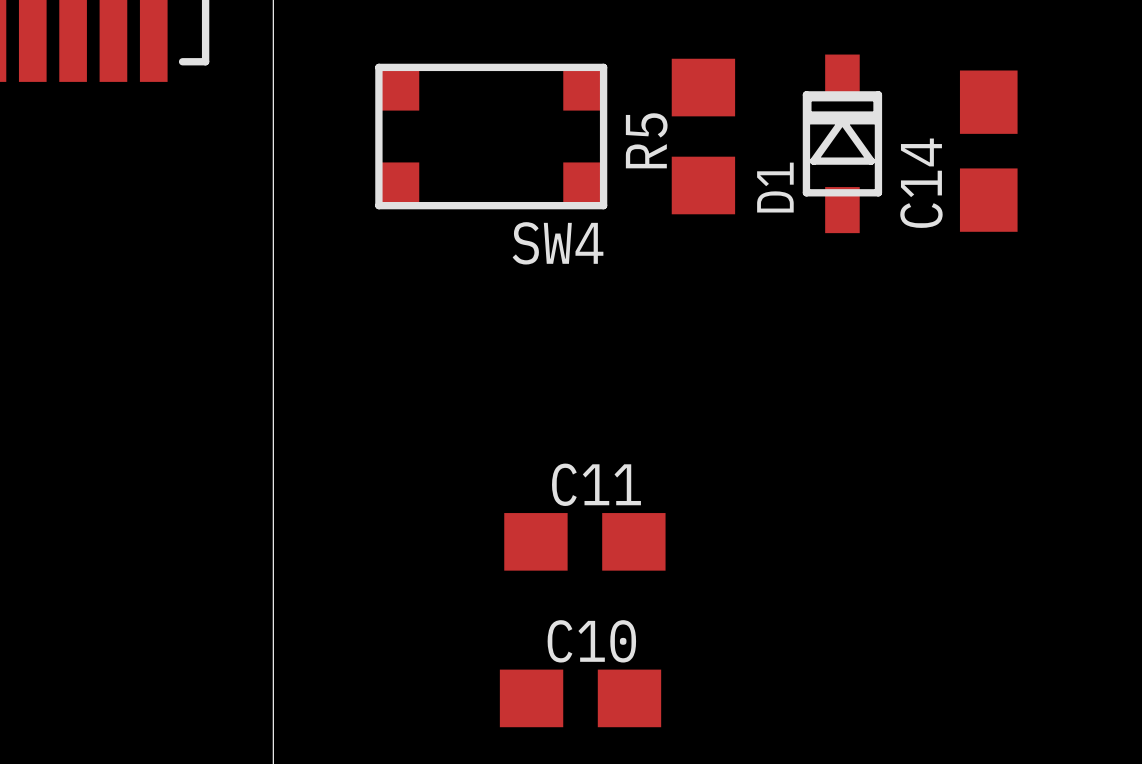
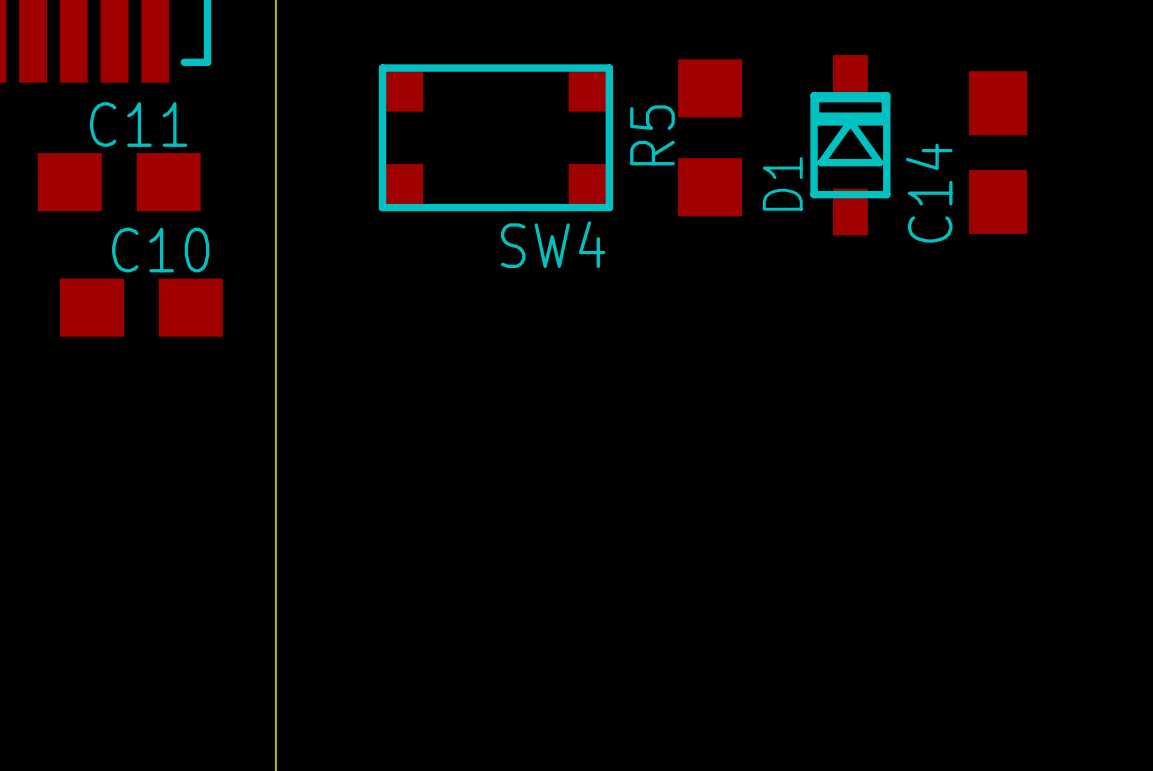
C11 position: (584, 541) -> (119, 182)
C10 position: (580, 698) -> (141, 307)

